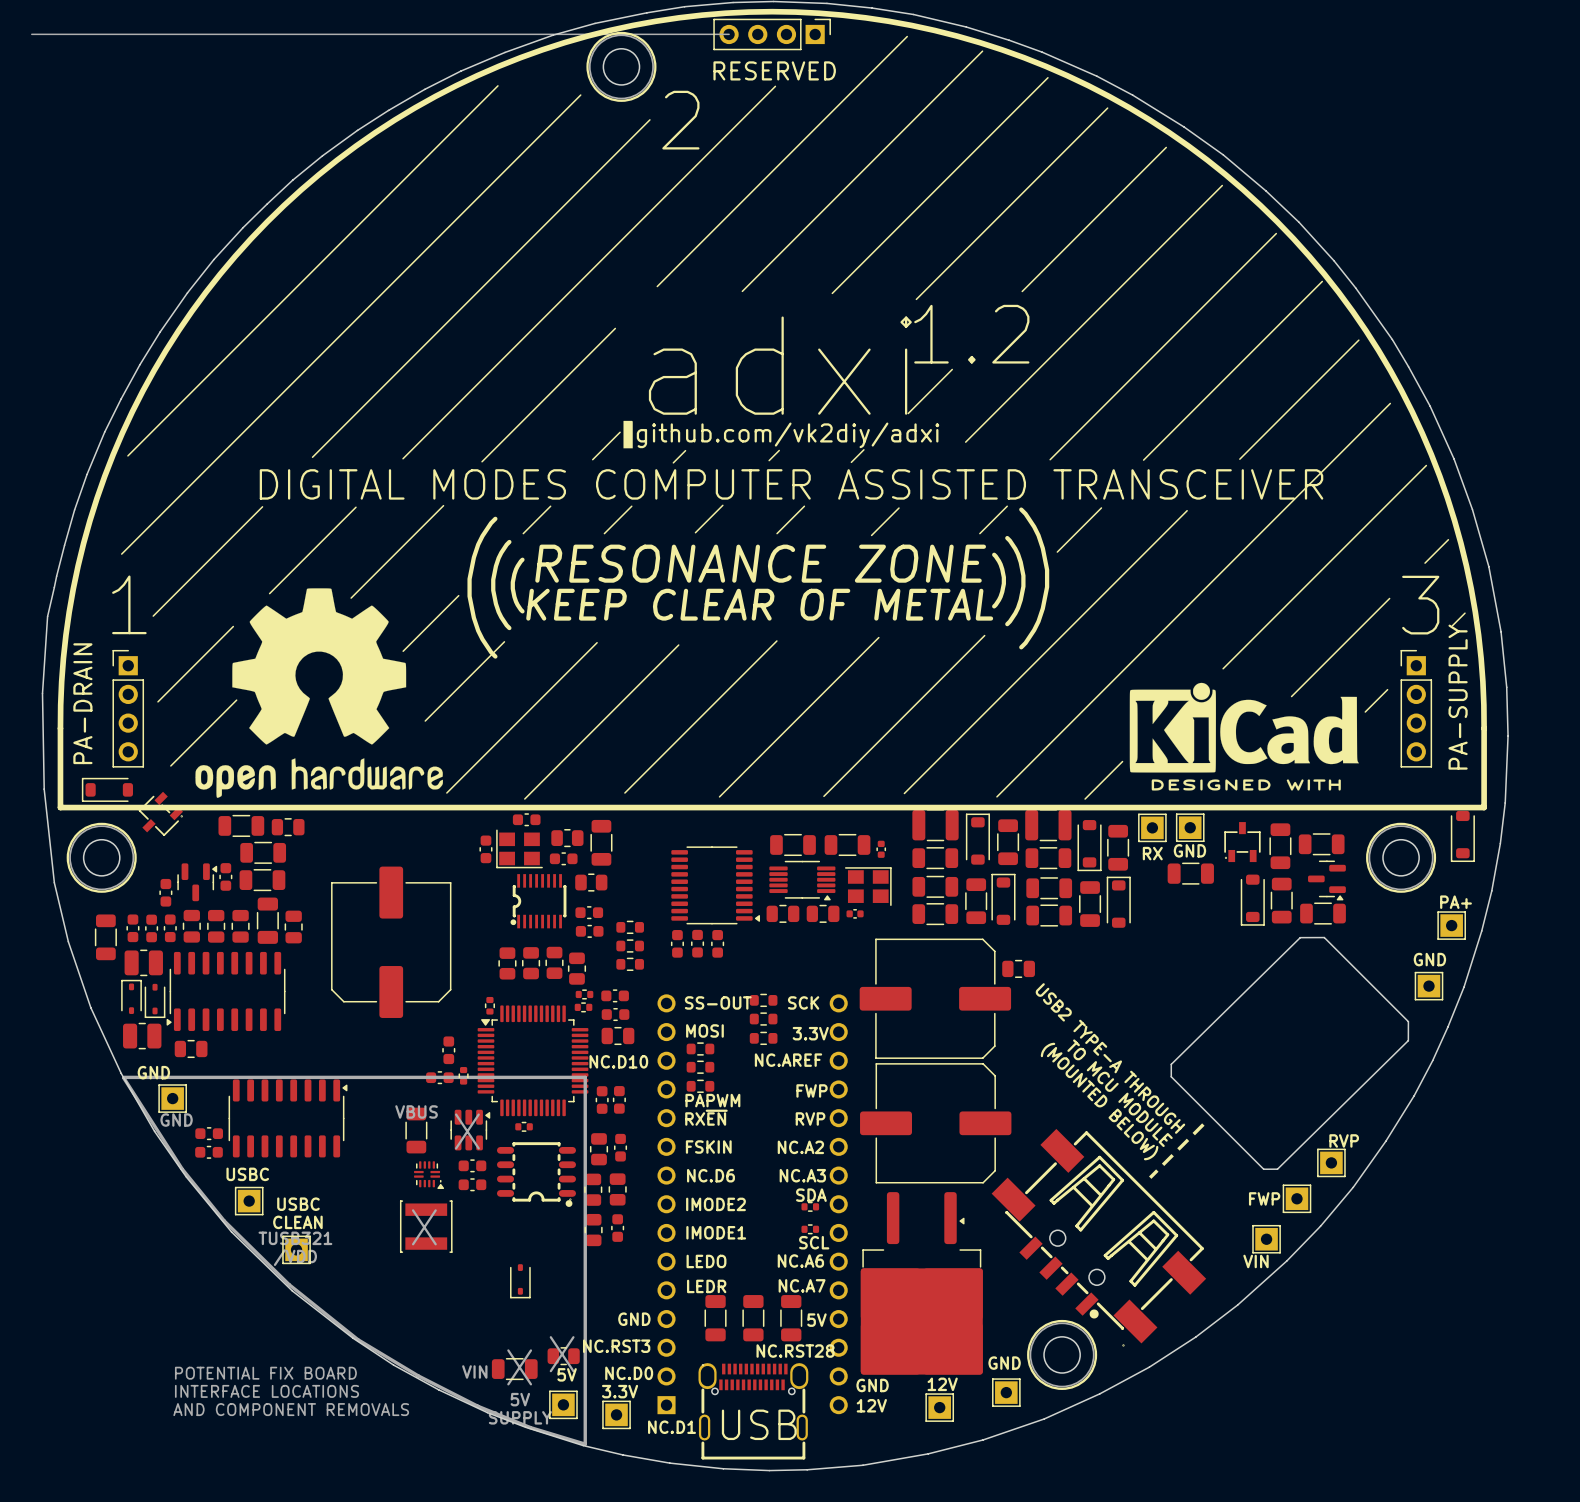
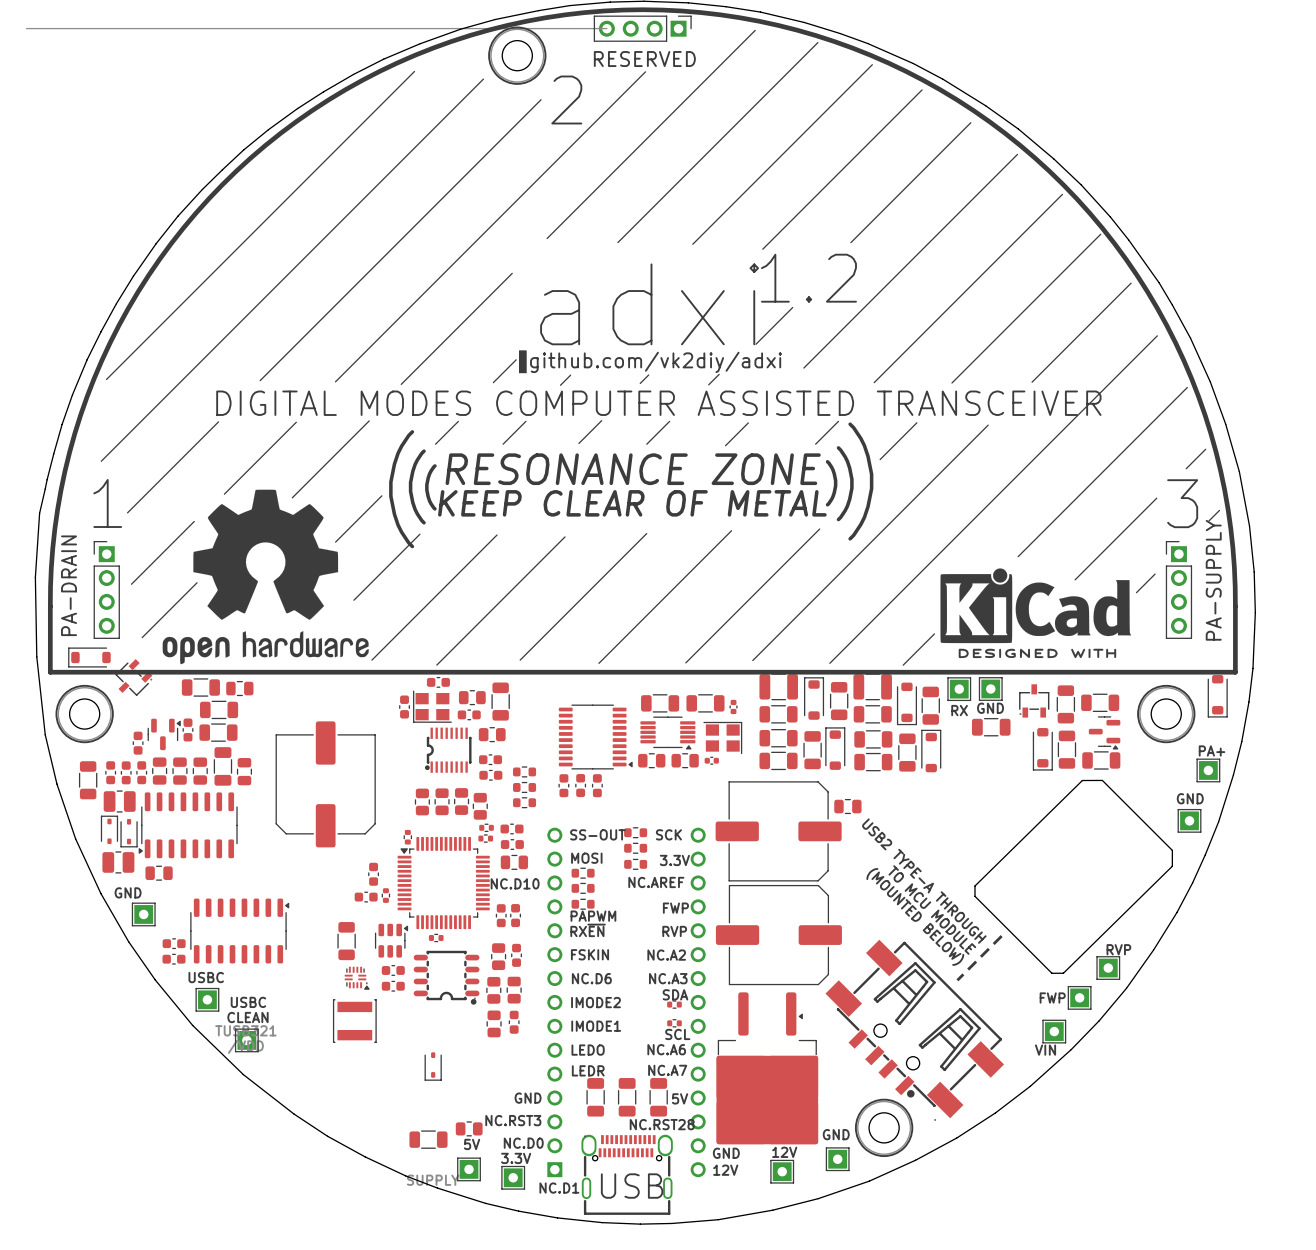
line: (123, 1077) (585, 1077) (585, 1444) (530, 1427) (477, 1406) (418, 1375) (357, 1339) (289, 1284) (224, 1220) (182, 1169) (123, 1077) -> none
text: VBUS (416, 1111) -> none
text: GND (176, 1120) -> none
text: X (467, 1131) -> none
text: X (424, 1227) -> none
text: X (562, 1354) -> none
text: X (519, 1367) -> none
text: VIN (474, 1371) -> none
text: POTENTIAL FIX BOARD (265, 1373) -> none
text: INTERFACE LOCATIONS (266, 1391) -> none
text: 5V (520, 1399) -> none
text: AND COMPONENT REMOVALS (291, 1409) -> none

